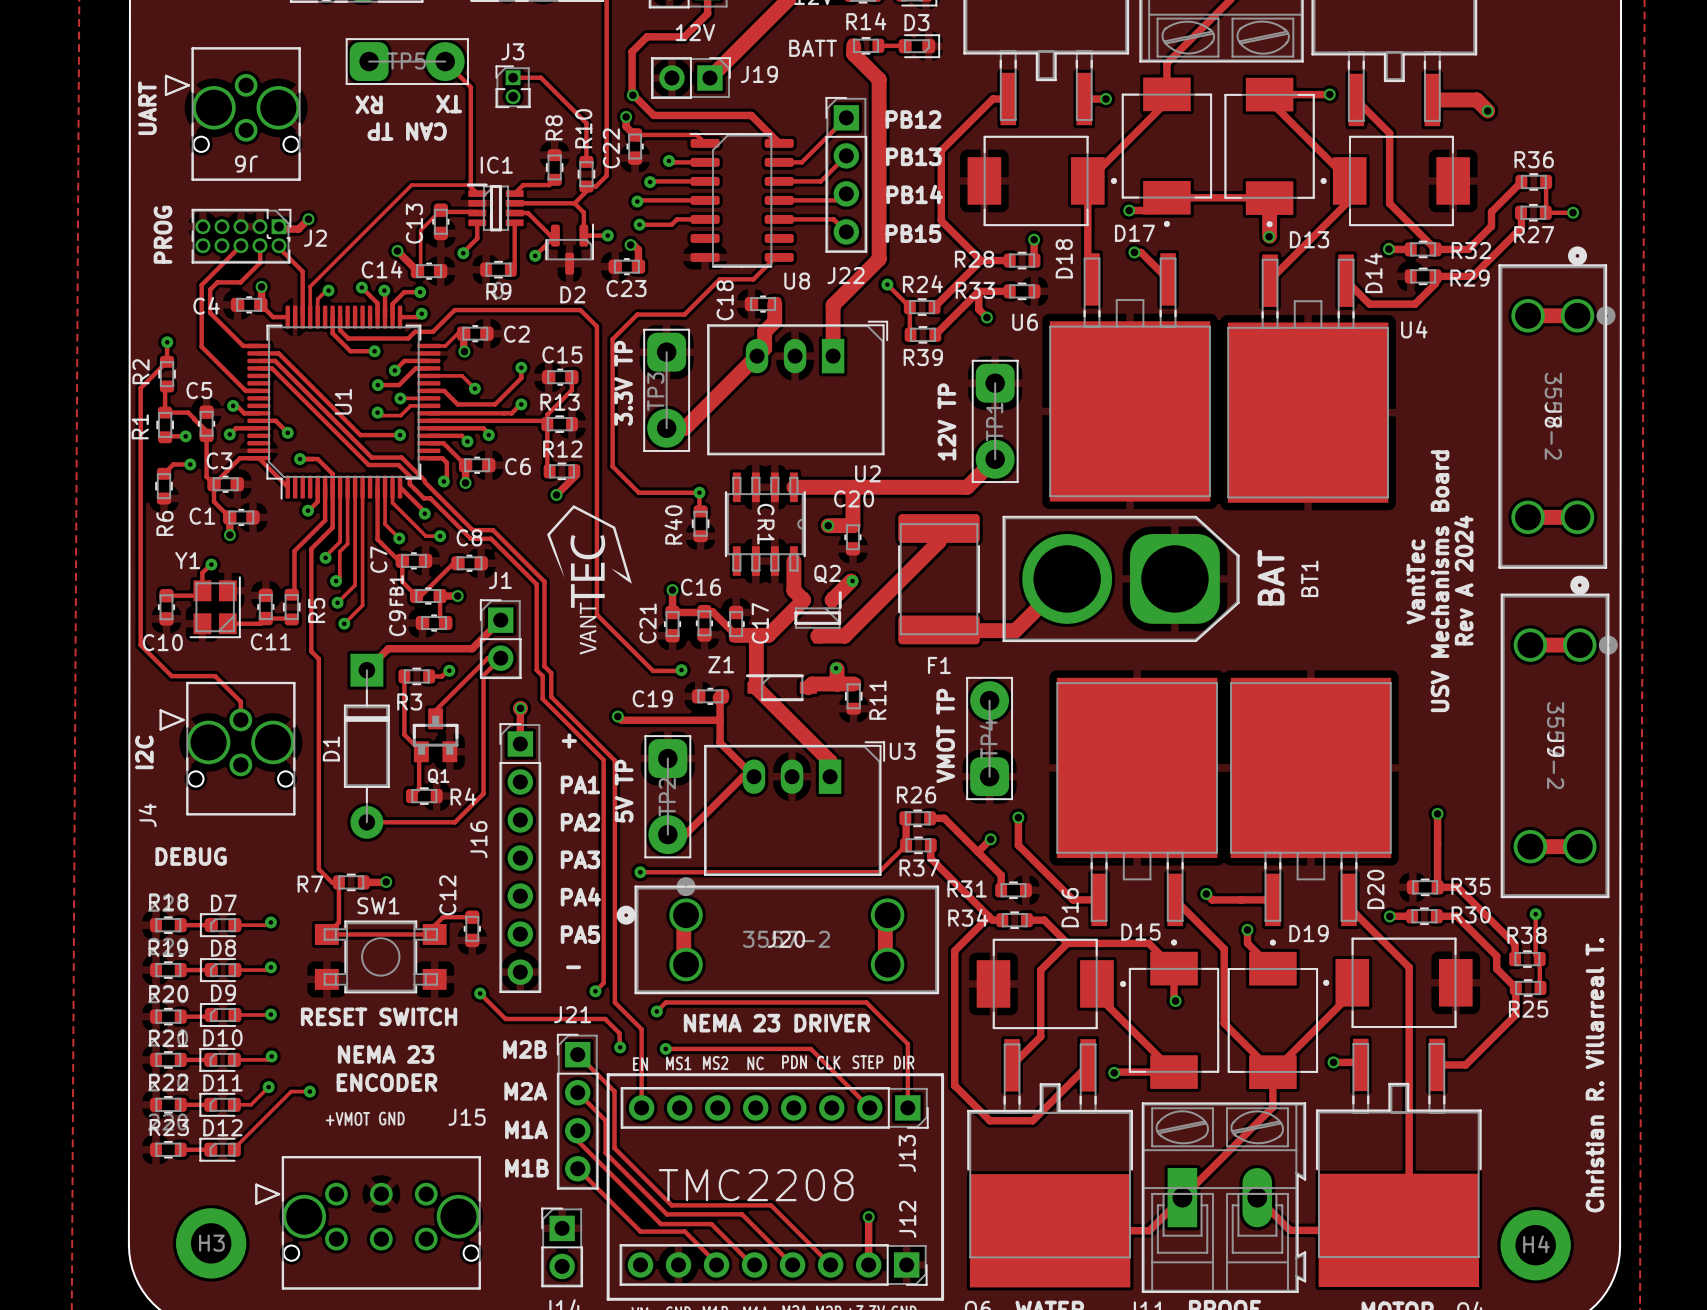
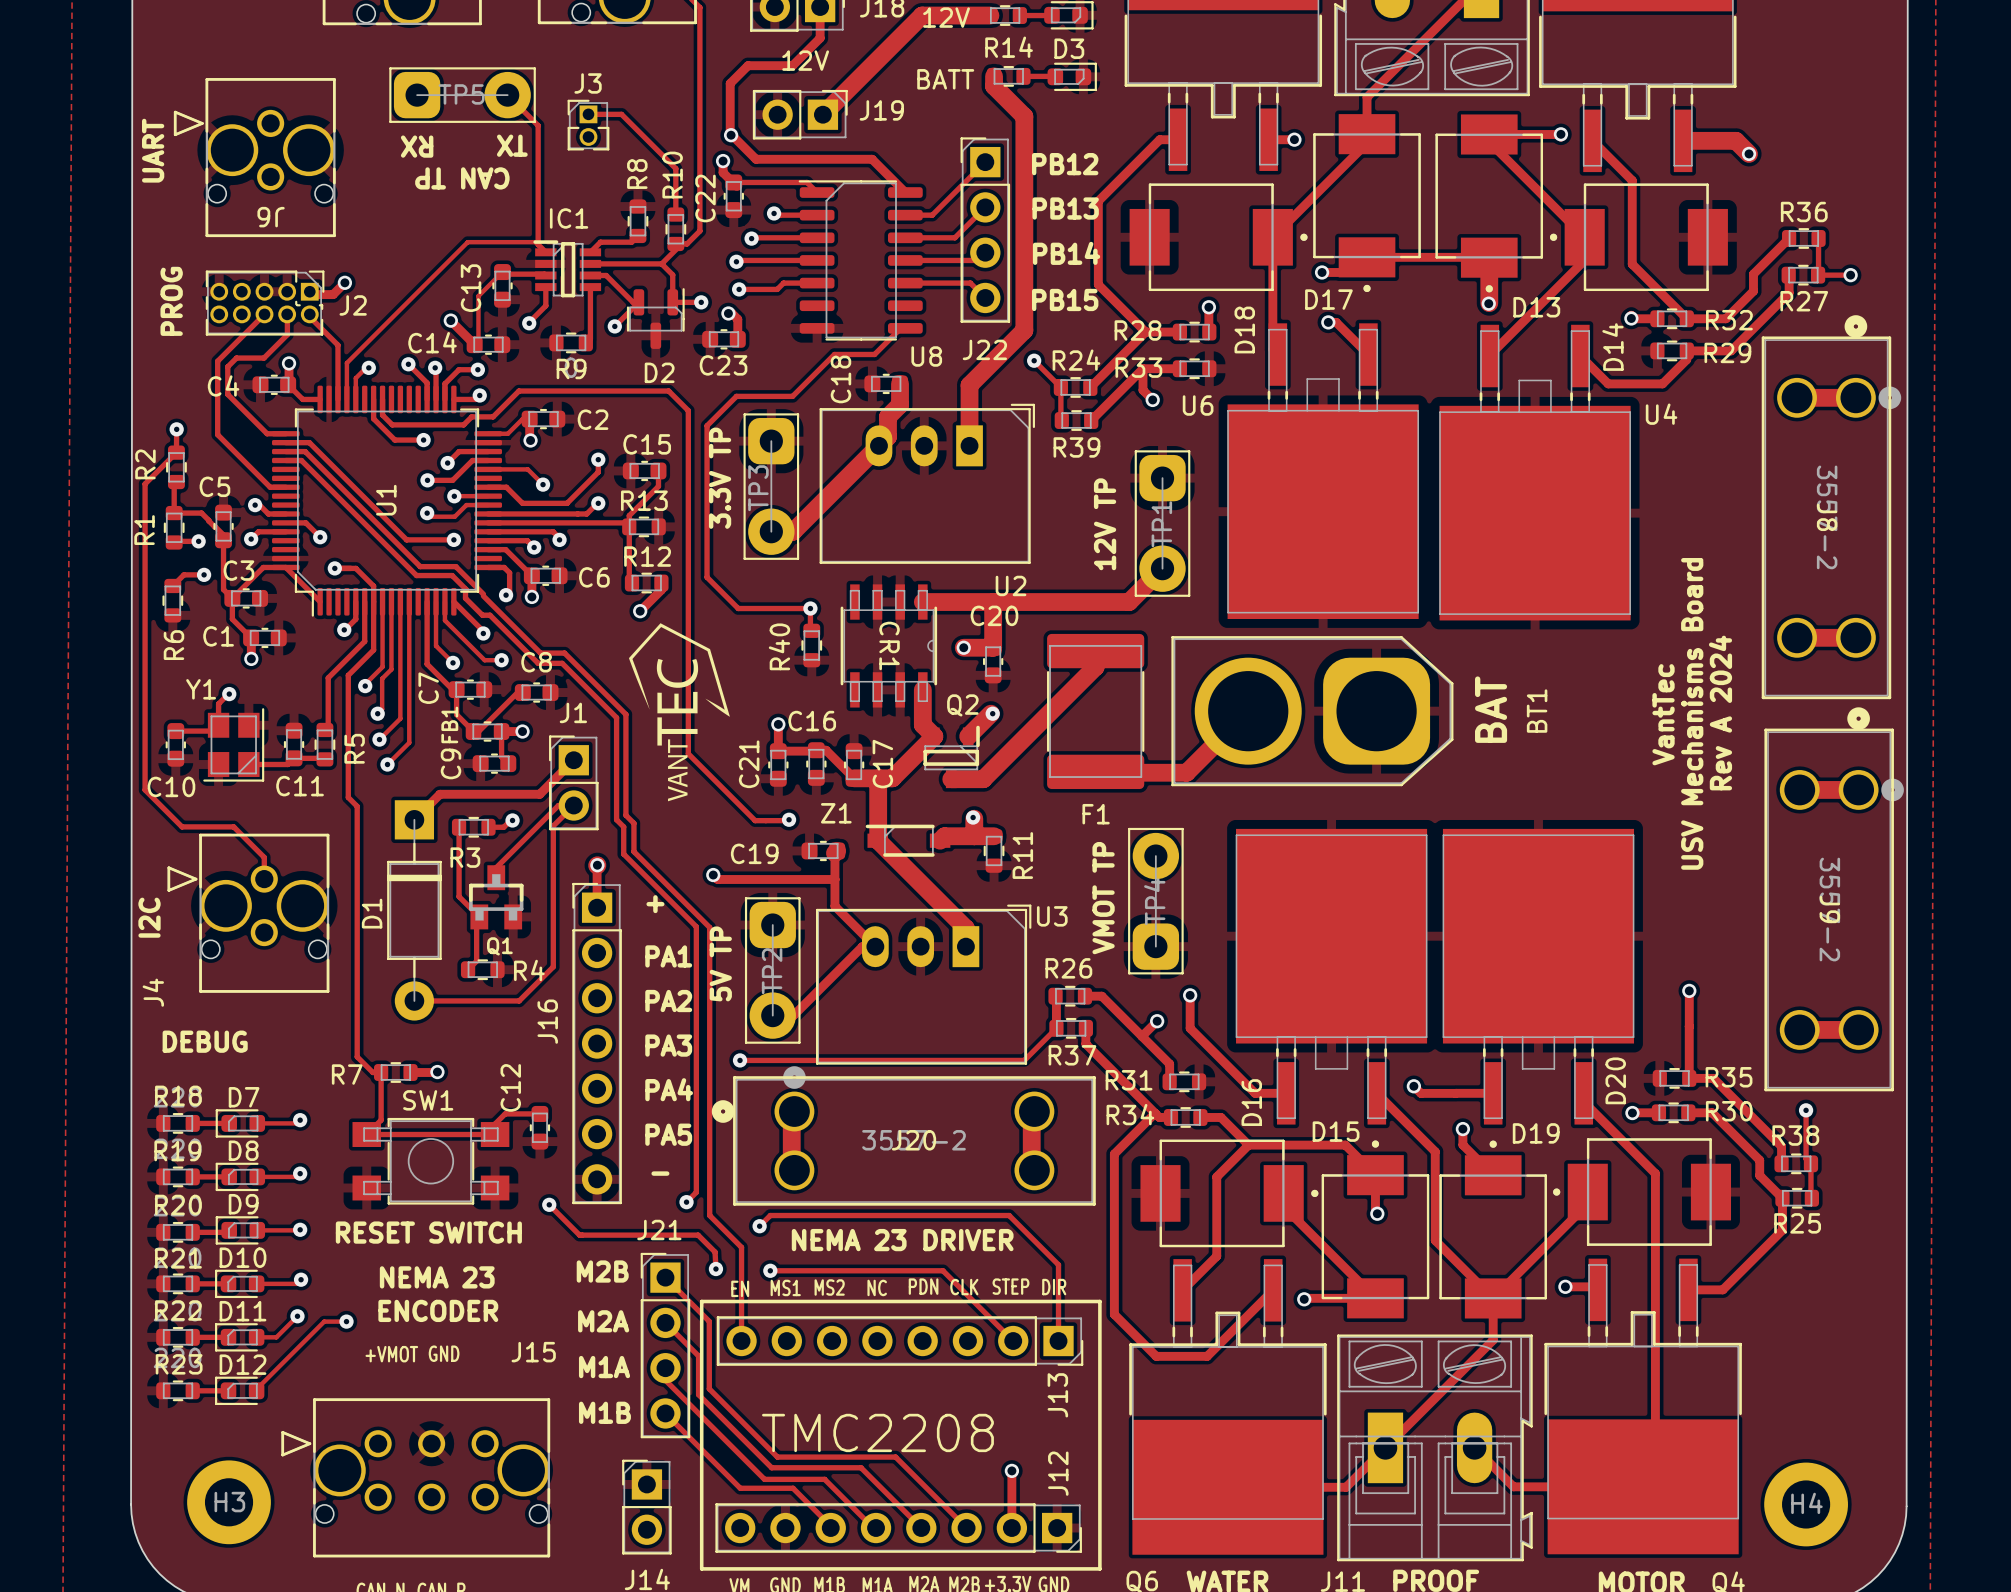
text: Christian R. Villarreal T. (1594, 1075) -> none

